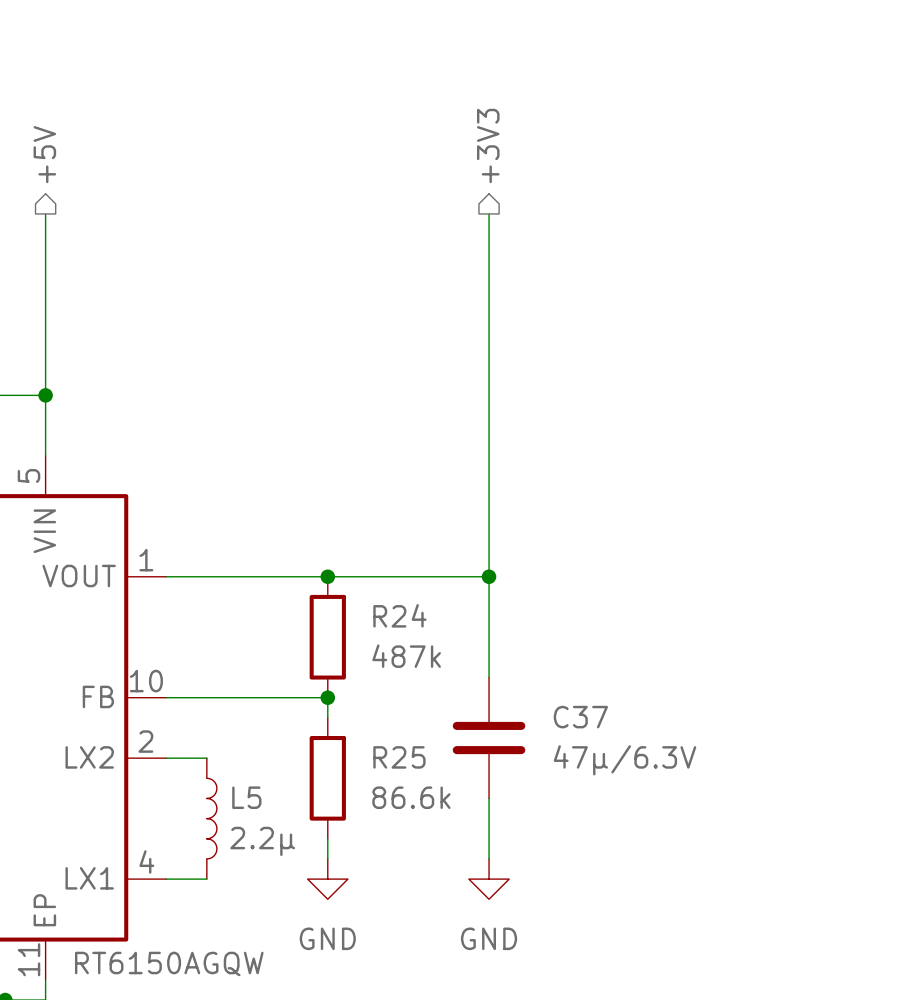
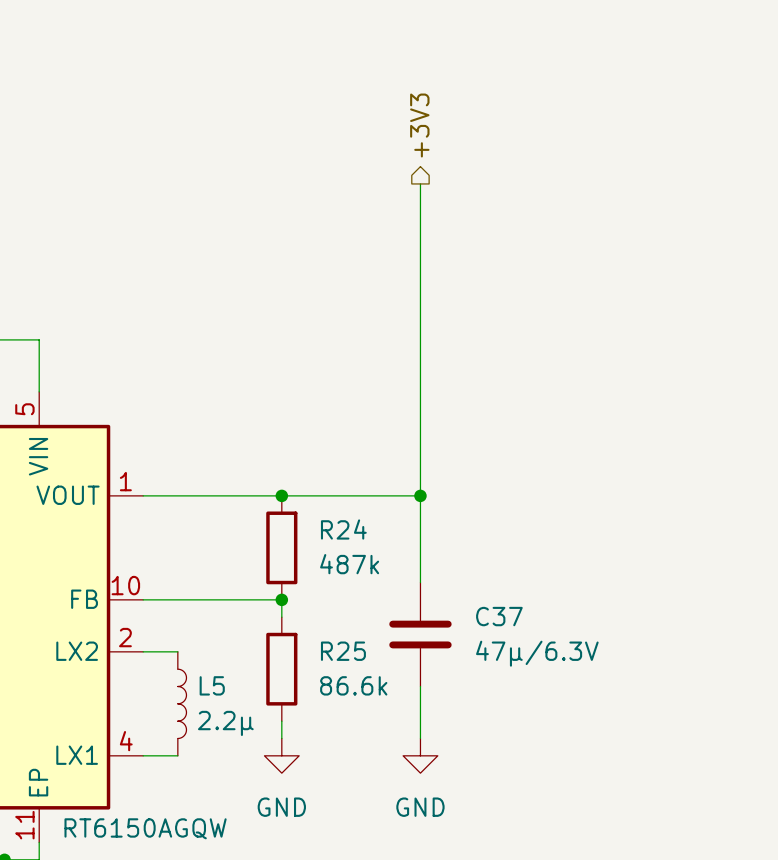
hierarchical label: +5V (44, 154) -> none
wire: (45, 213) (45, 395) -> none
junction: (45, 395) -> none

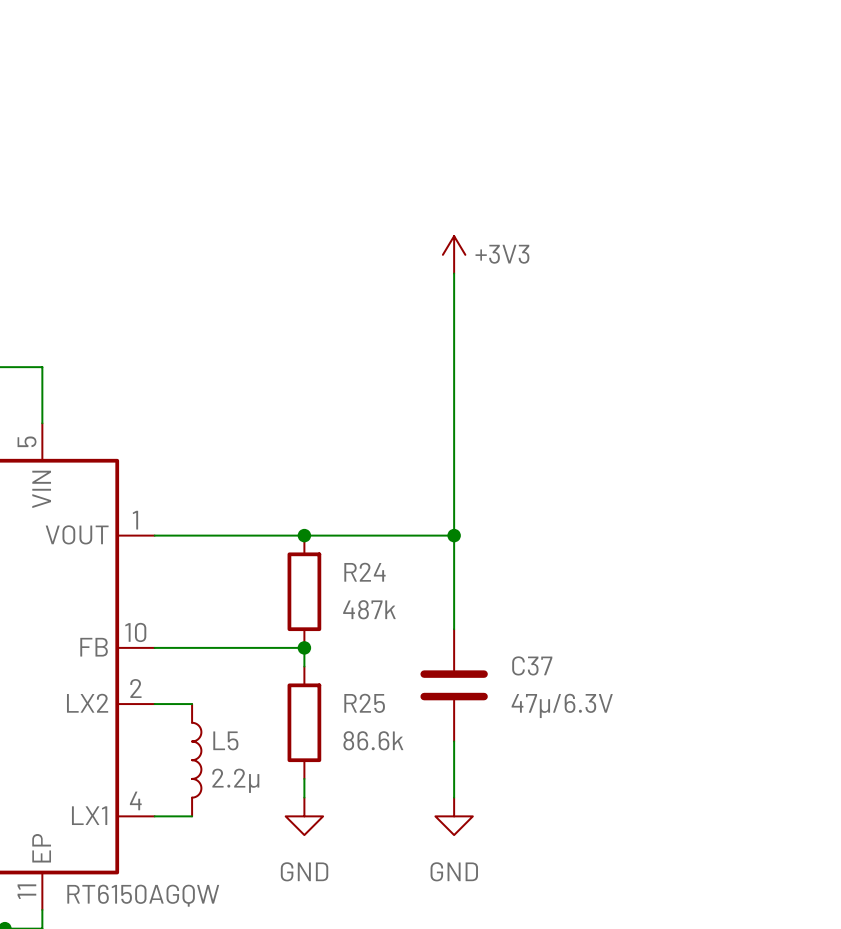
hierarchical label: +3V3 (419, 125) -> none
wire: (420, 183) (420, 253) -> none
power symbol: none -> +3V3 (454, 254)

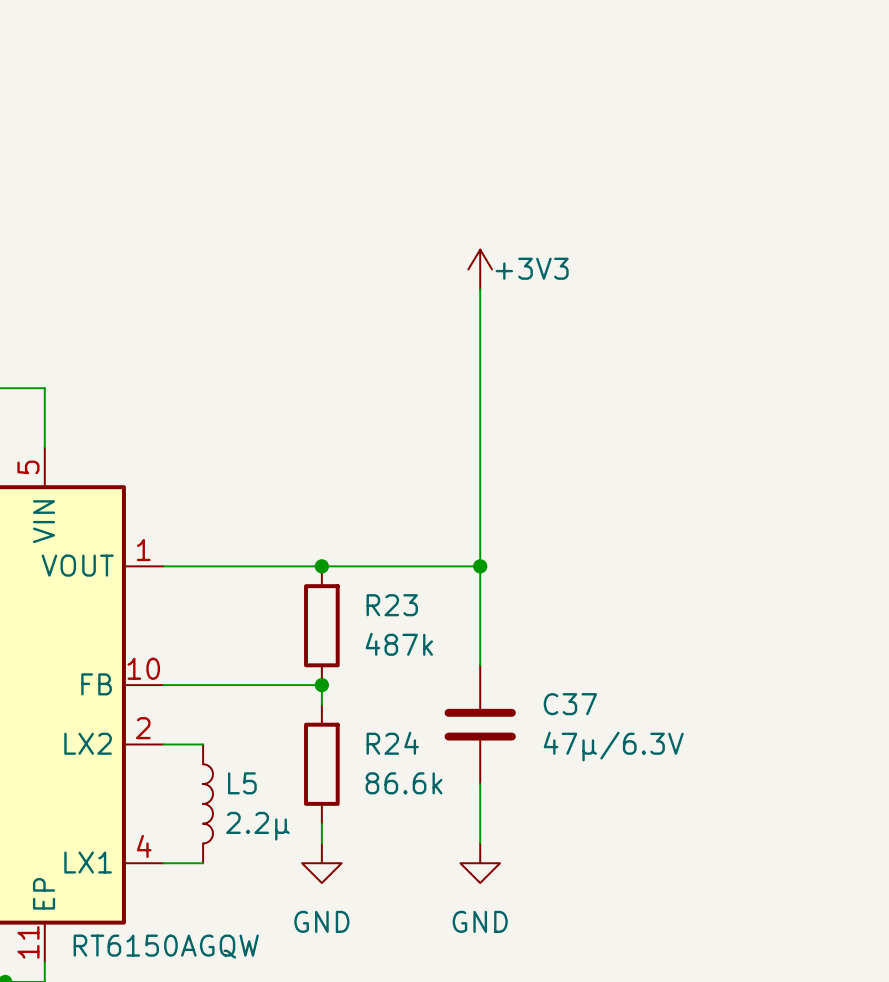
R24 name: R24 (364, 572) -> R23 (392, 605)
R25 name: R25 (364, 703) -> R24 (392, 743)

